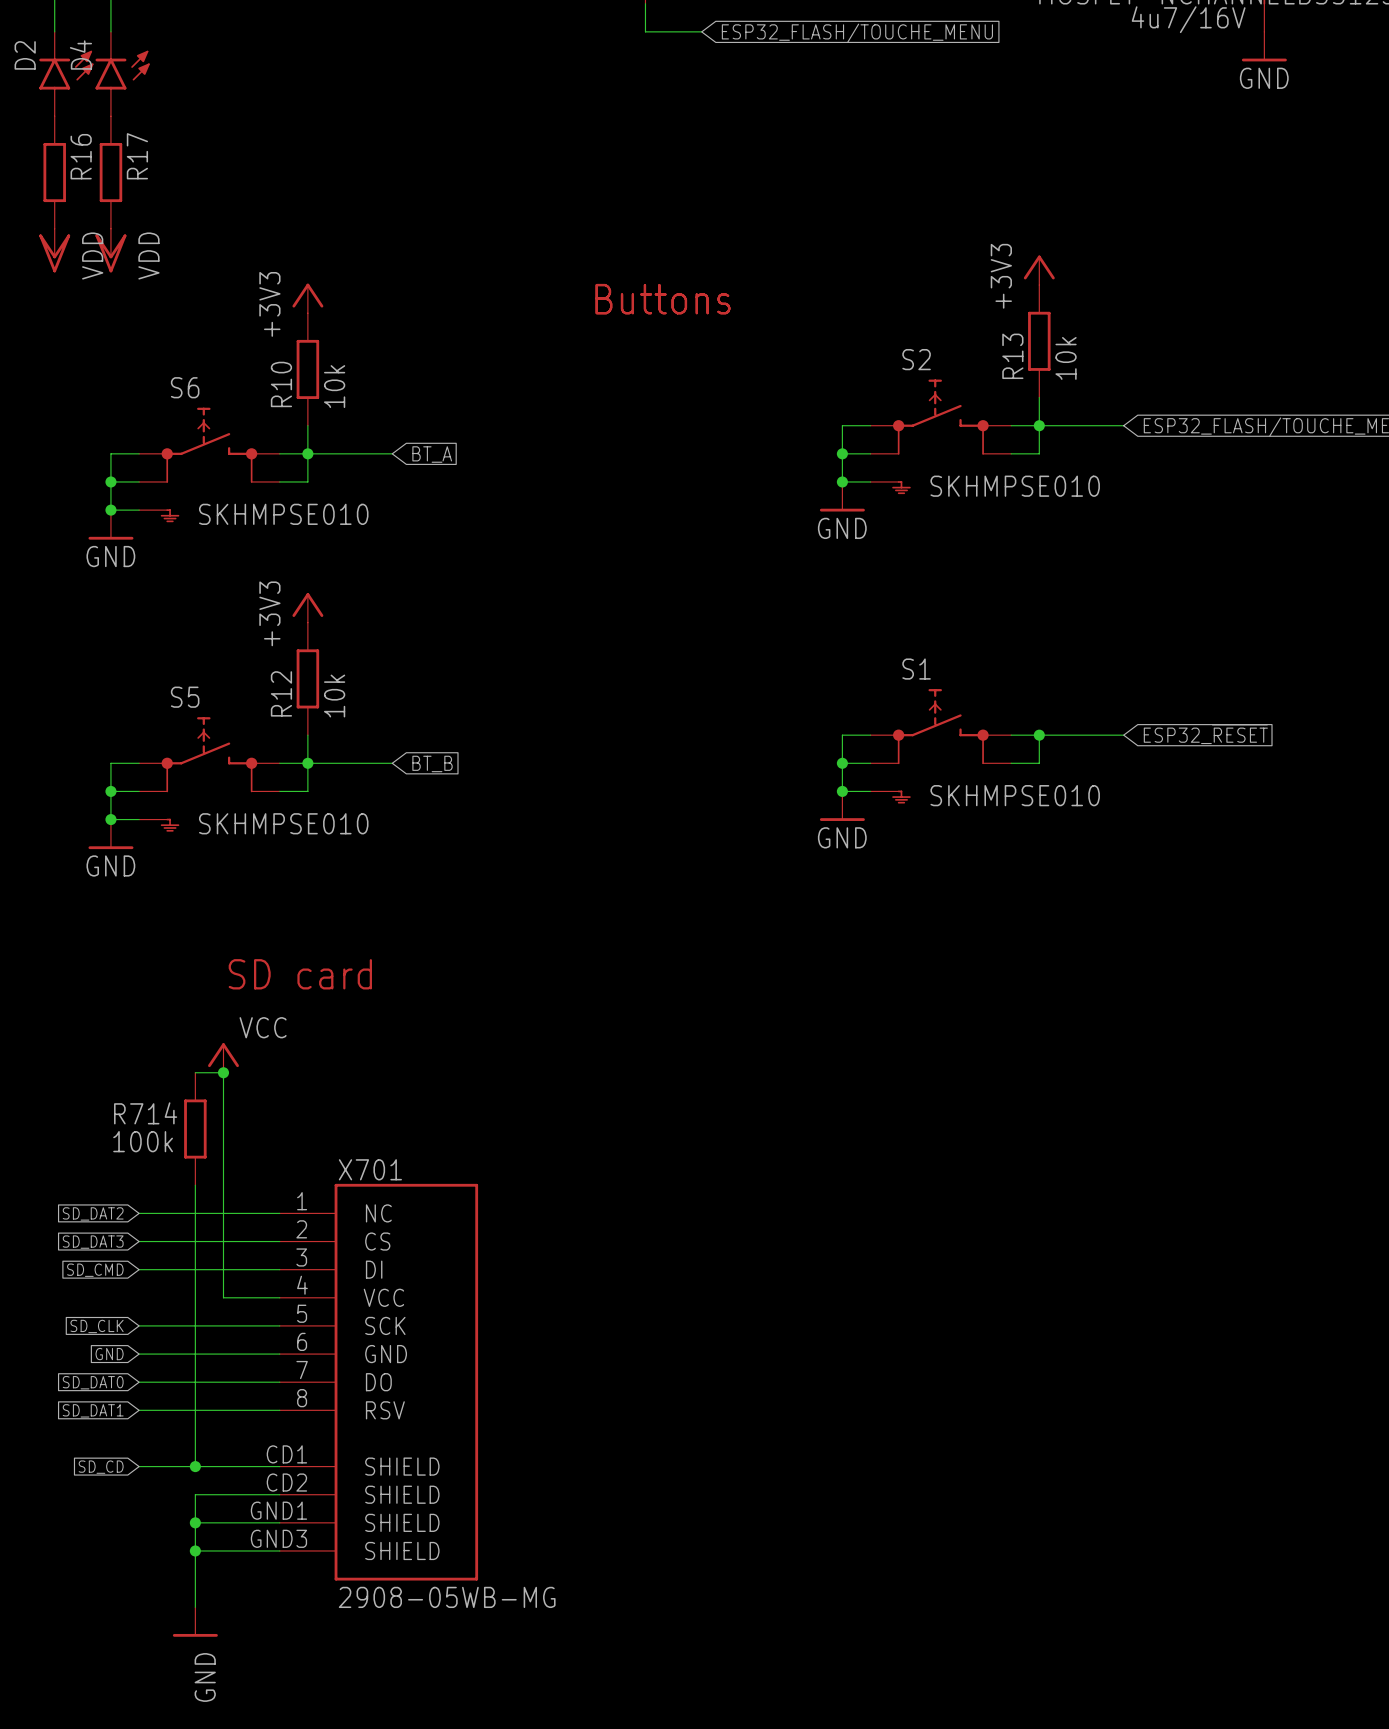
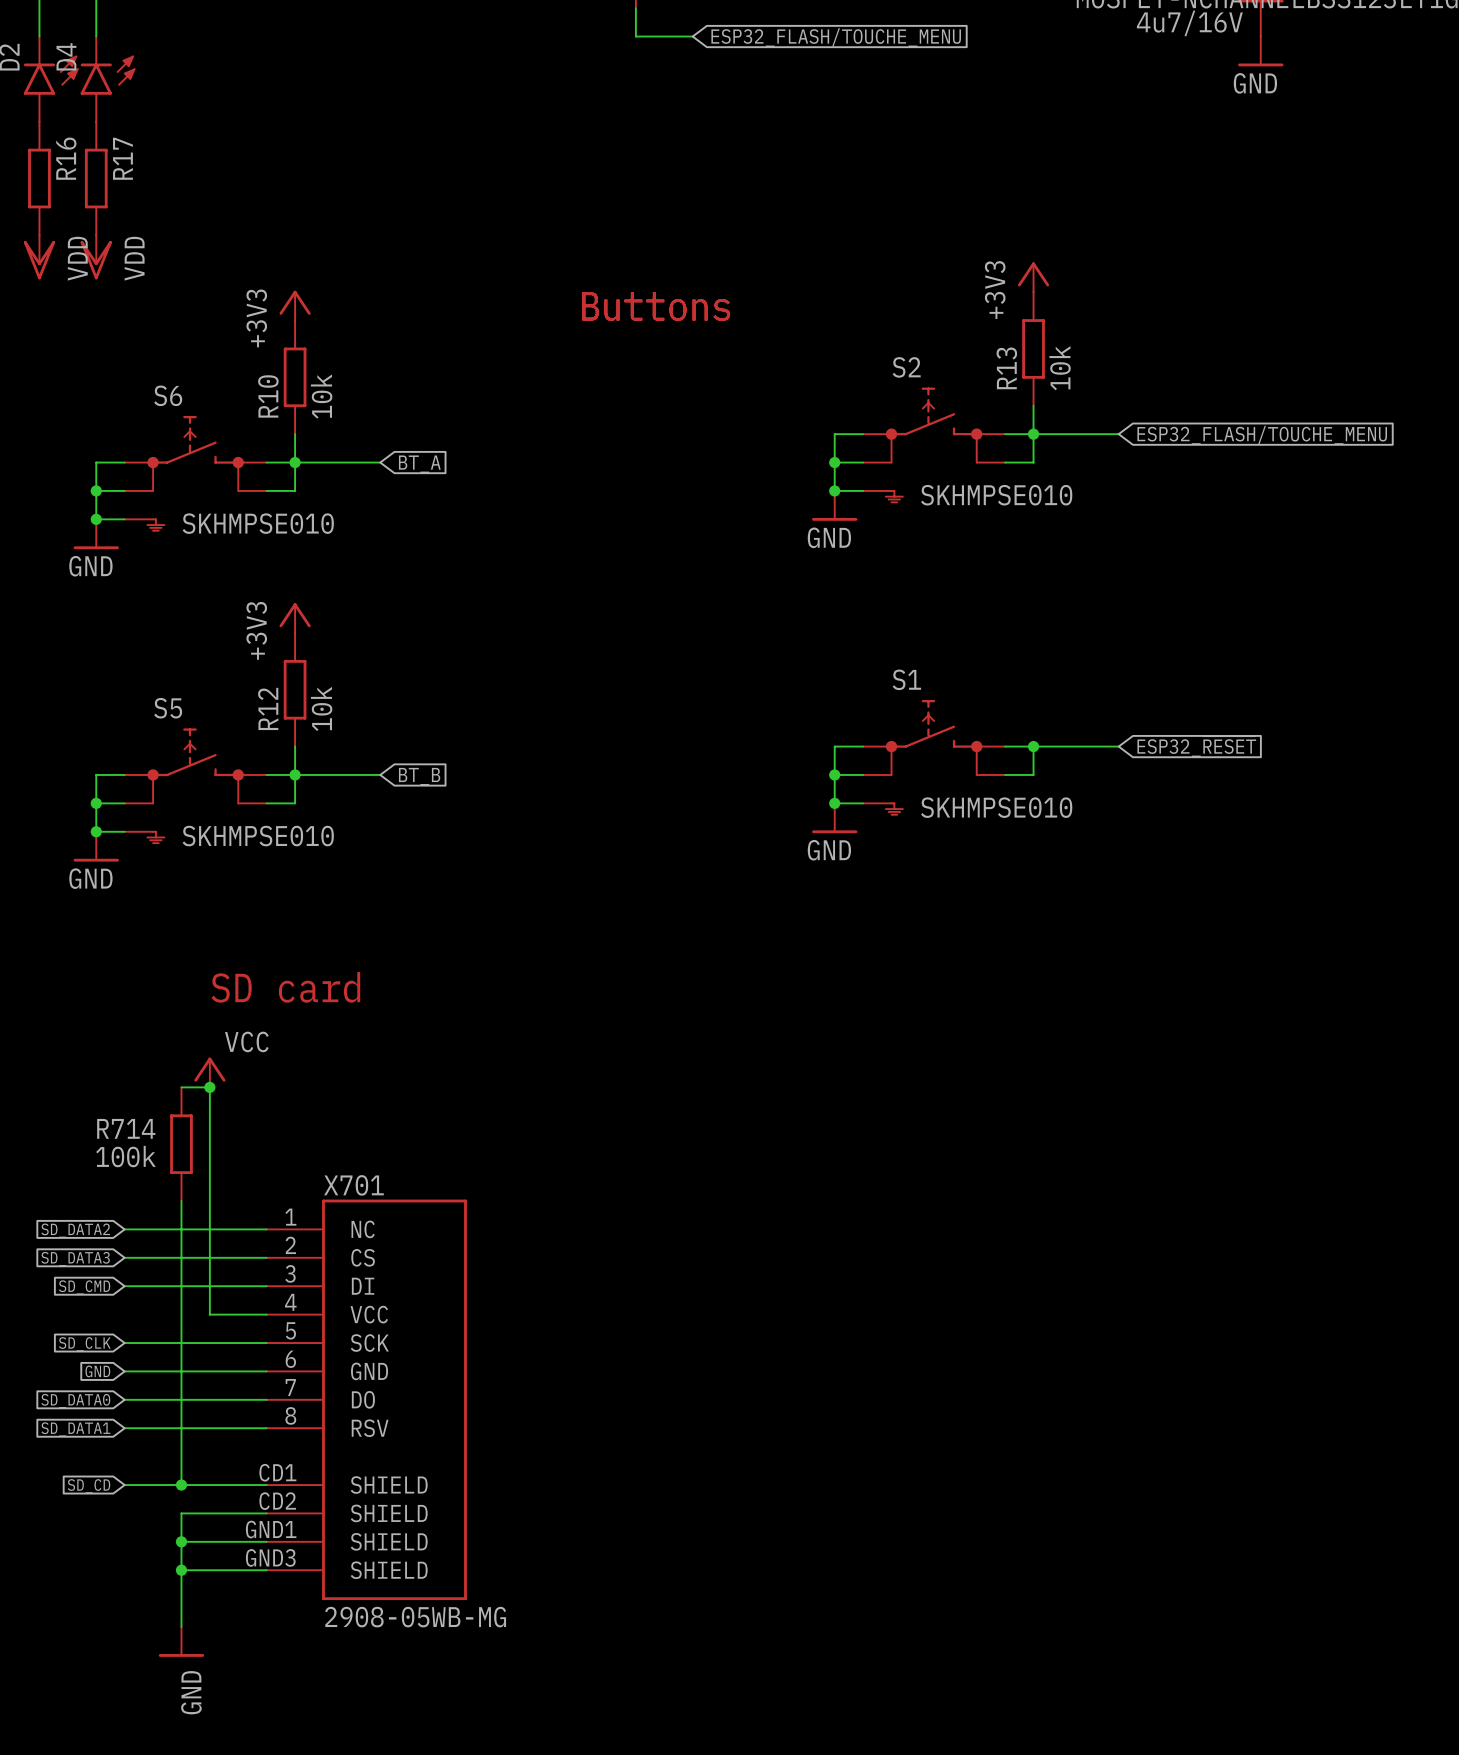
global label: SD_DAT2 (93, 1213) -> SD_DATA2 (75, 1230)
global label: SD_DAT3 (93, 1242) -> SD_DATA3 (75, 1259)
global label: SD_DAT0 (93, 1382) -> SD_DATA0 (75, 1401)
global label: SD_DAT1 (93, 1410) -> SD_DATA1 (75, 1429)

